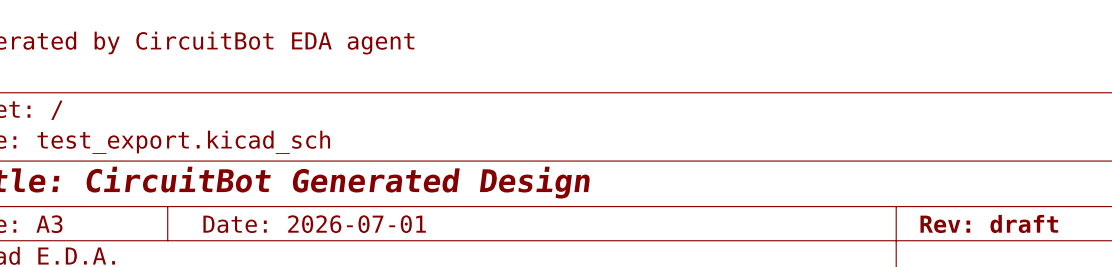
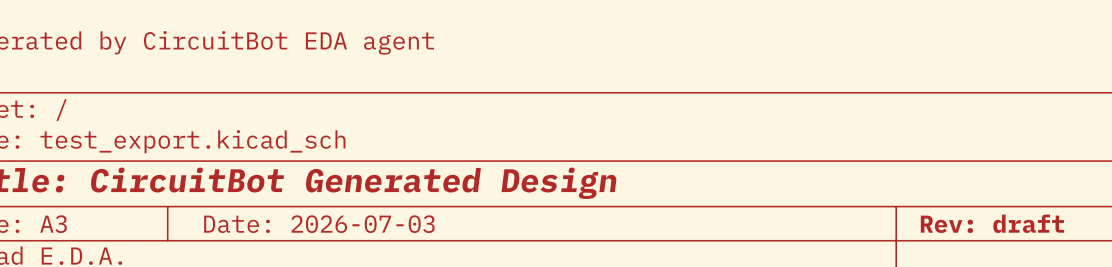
title block: Date: 2026-07-01 (314, 224) -> Date: 2026-07-03 (319, 224)

